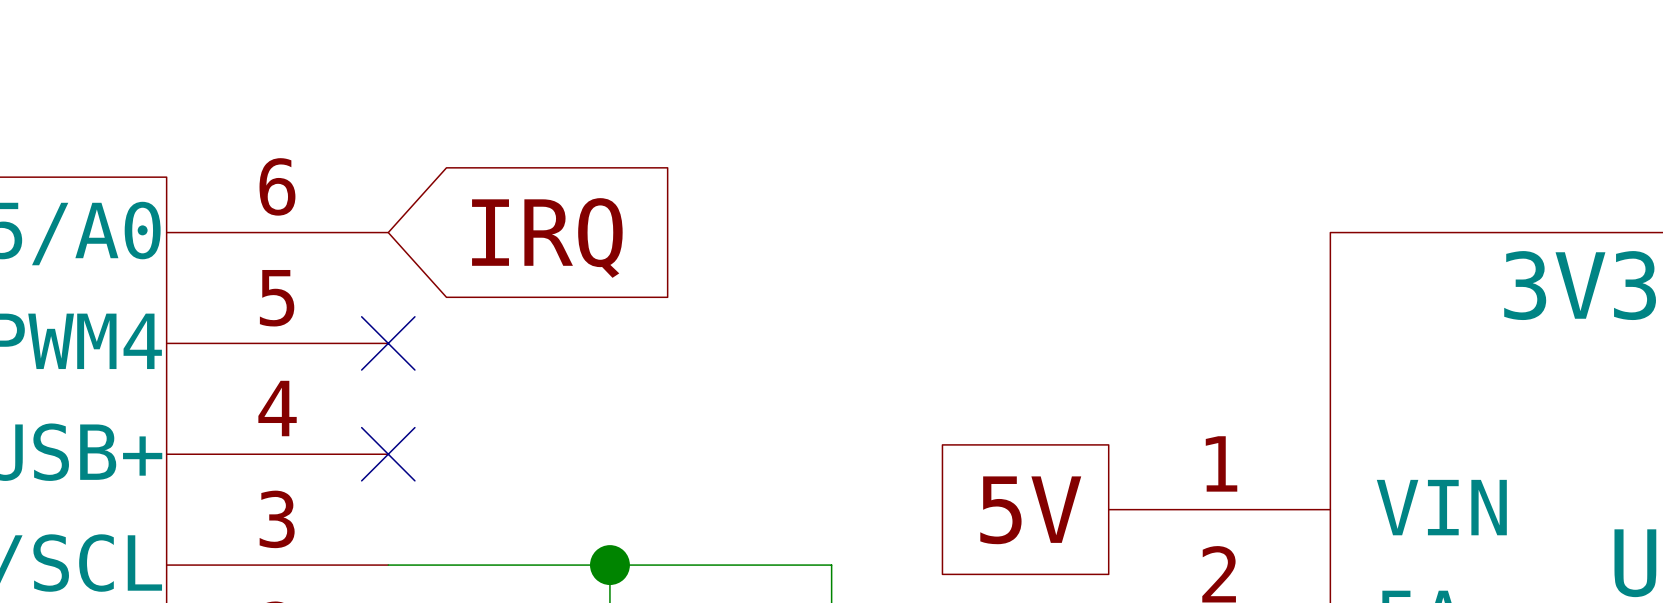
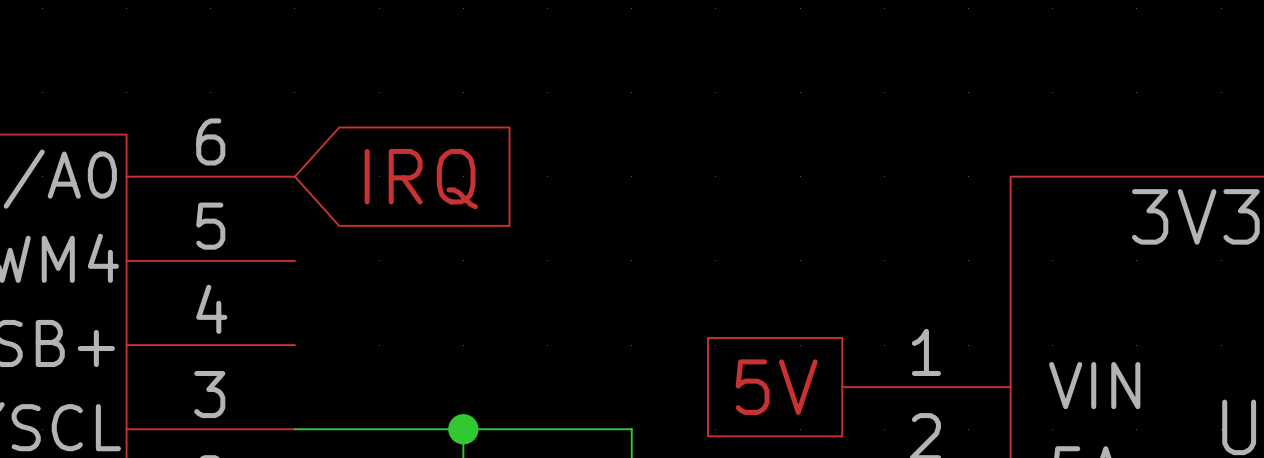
no-connect mark: (388, 343) -> none
no-connect mark: (388, 454) -> none

